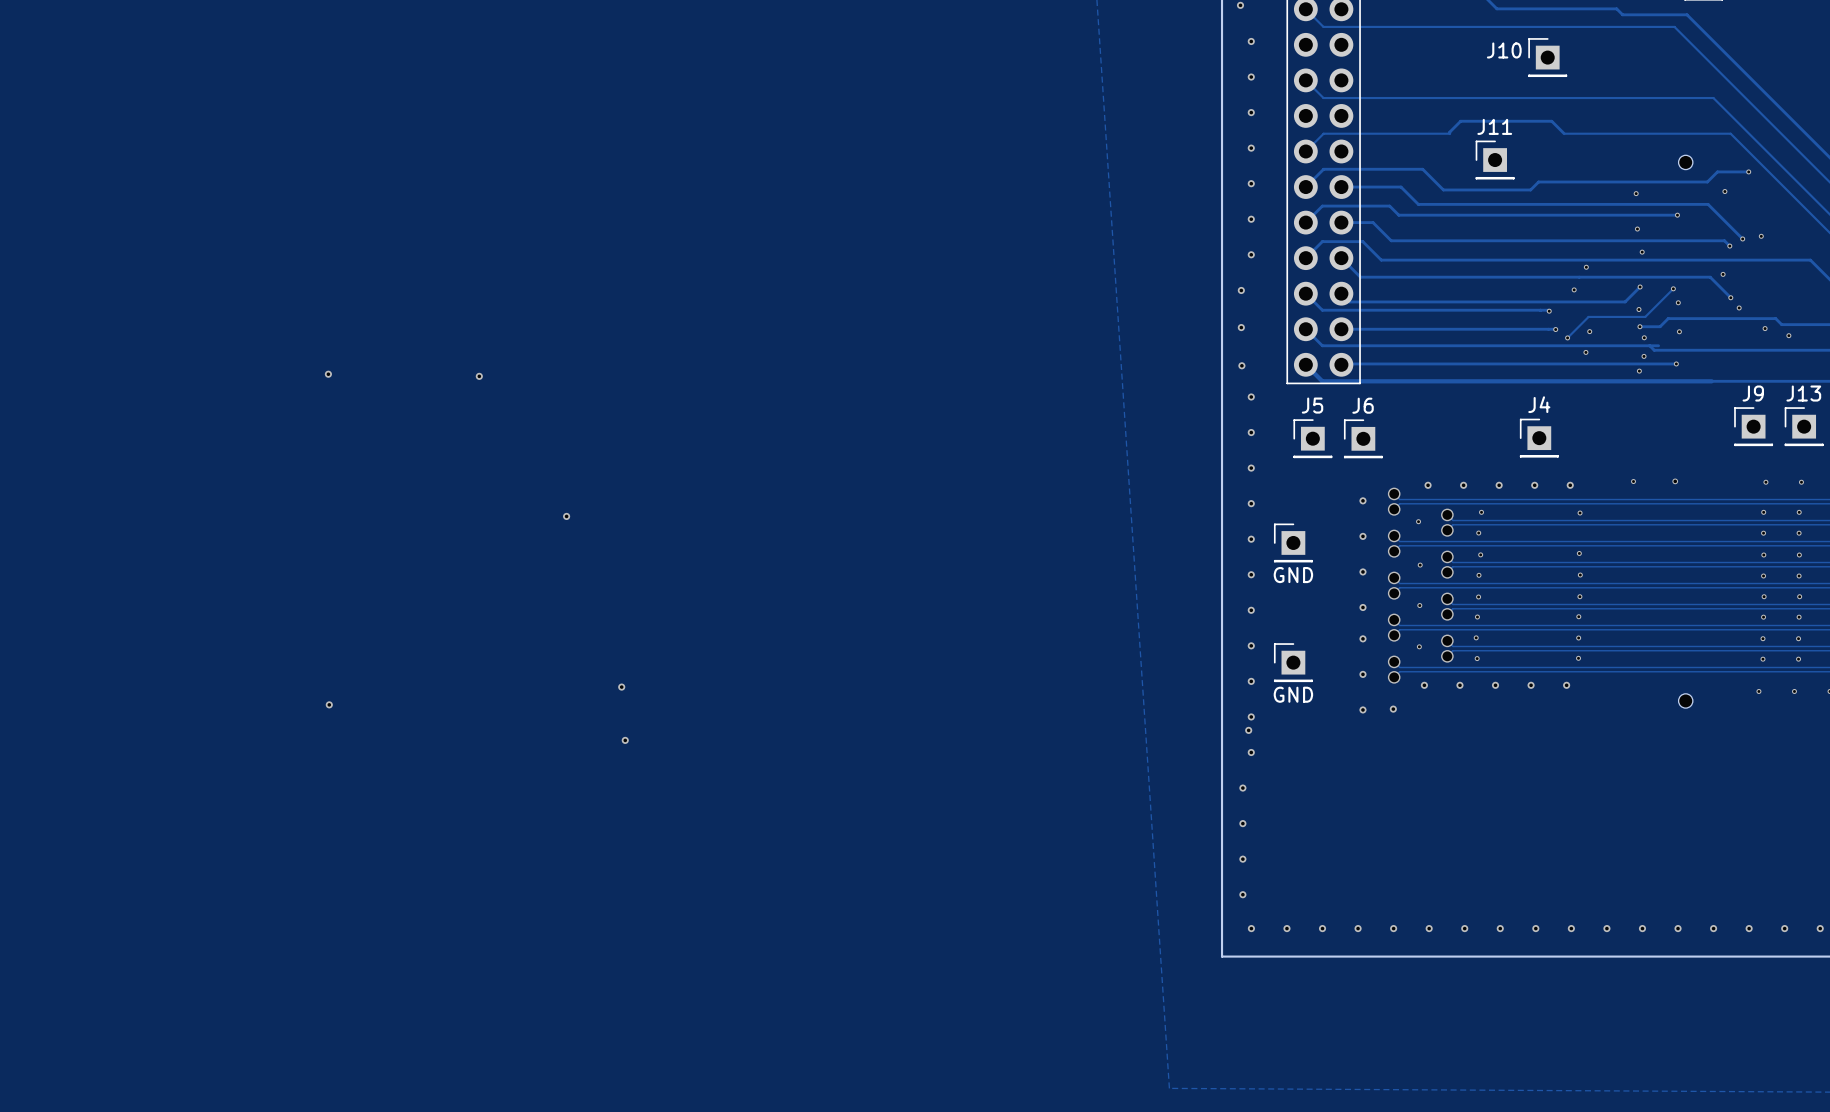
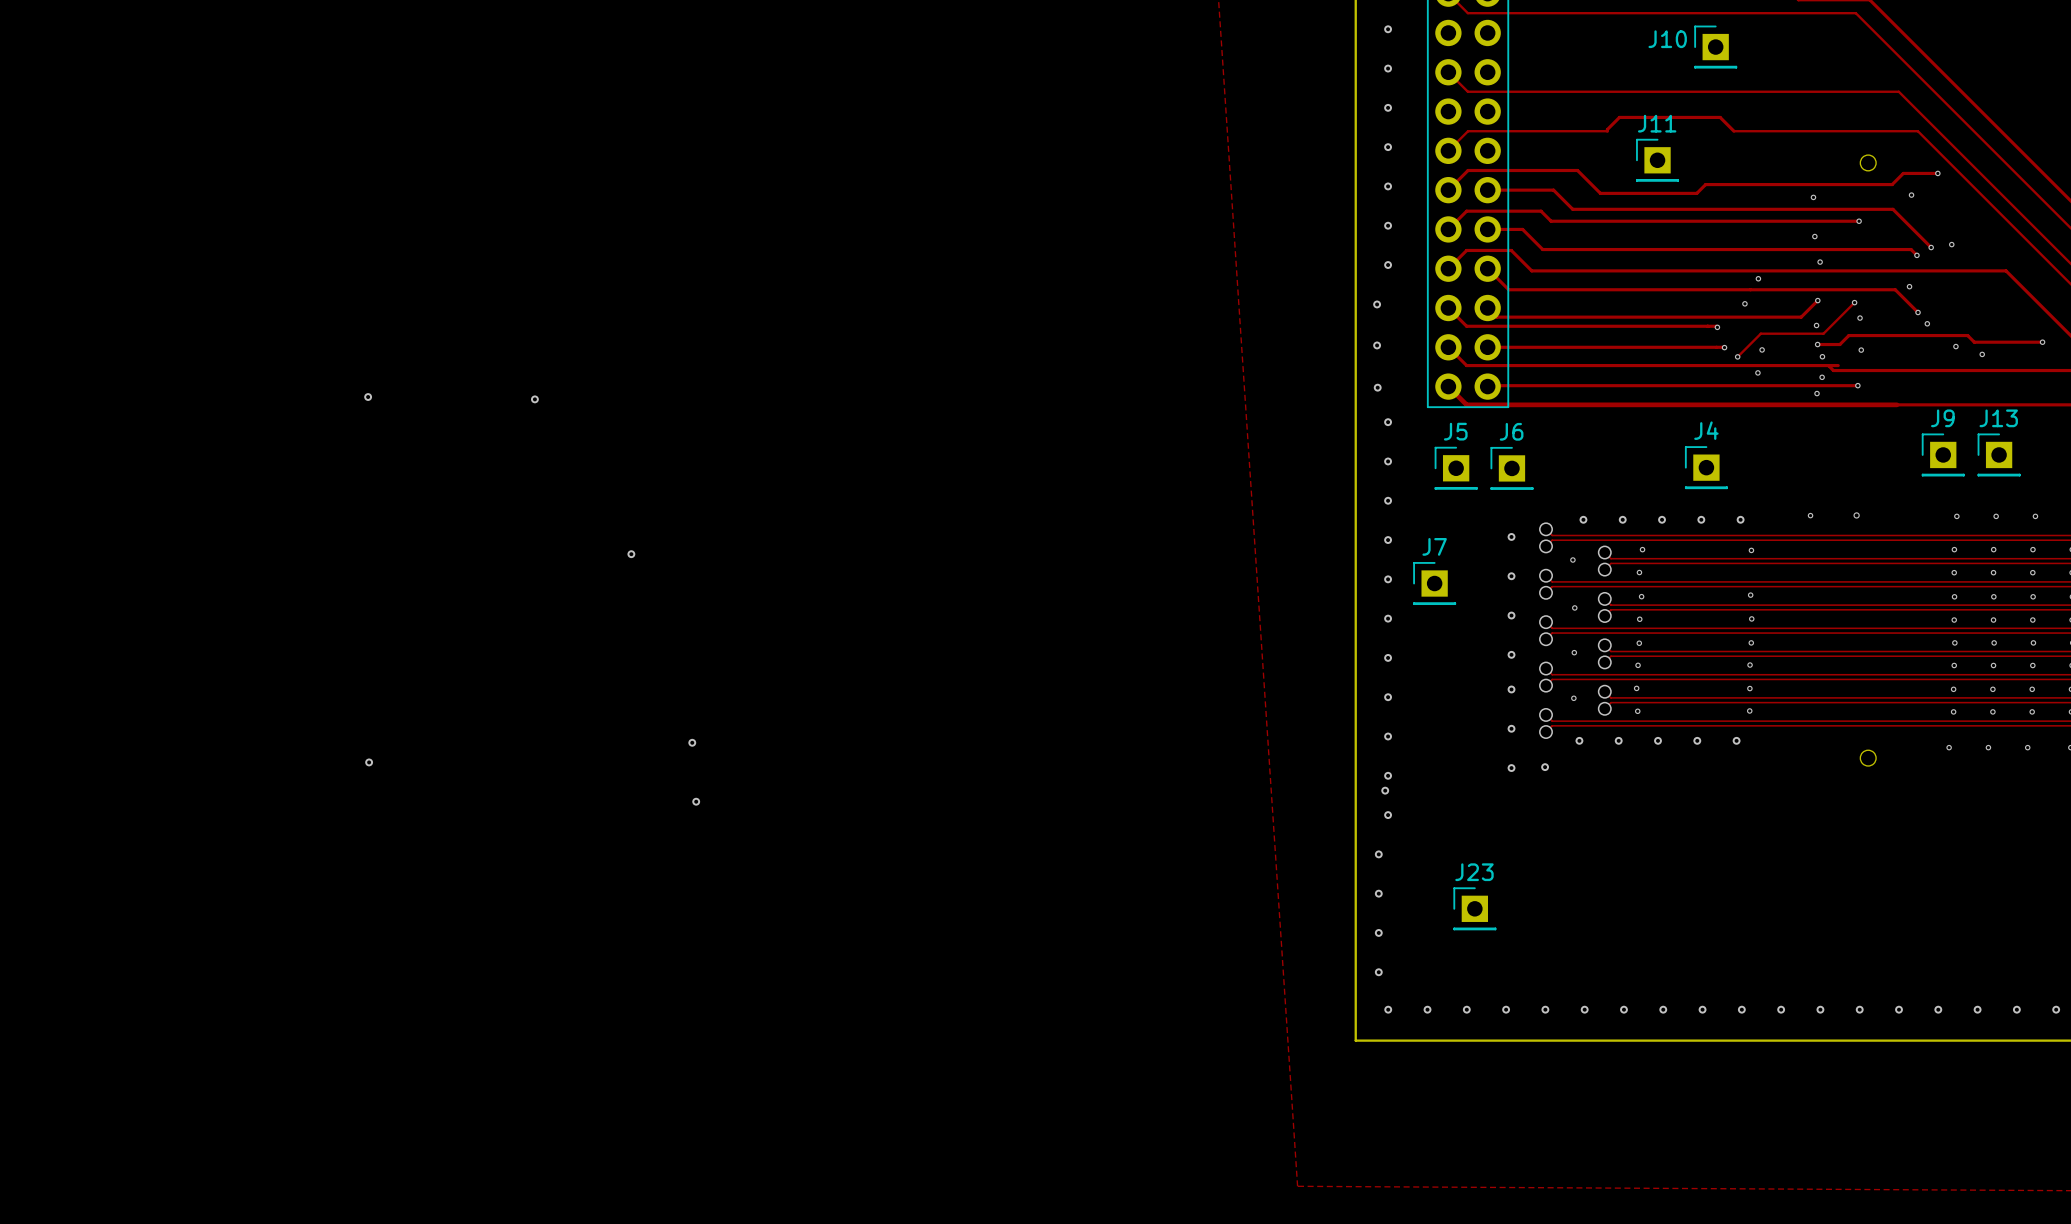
J7 name: none -> J7 (1434, 546)
J7 value: GND (1293, 575) -> none
part: GND (1293, 662) -> none
J23: none -> (1474, 908)

